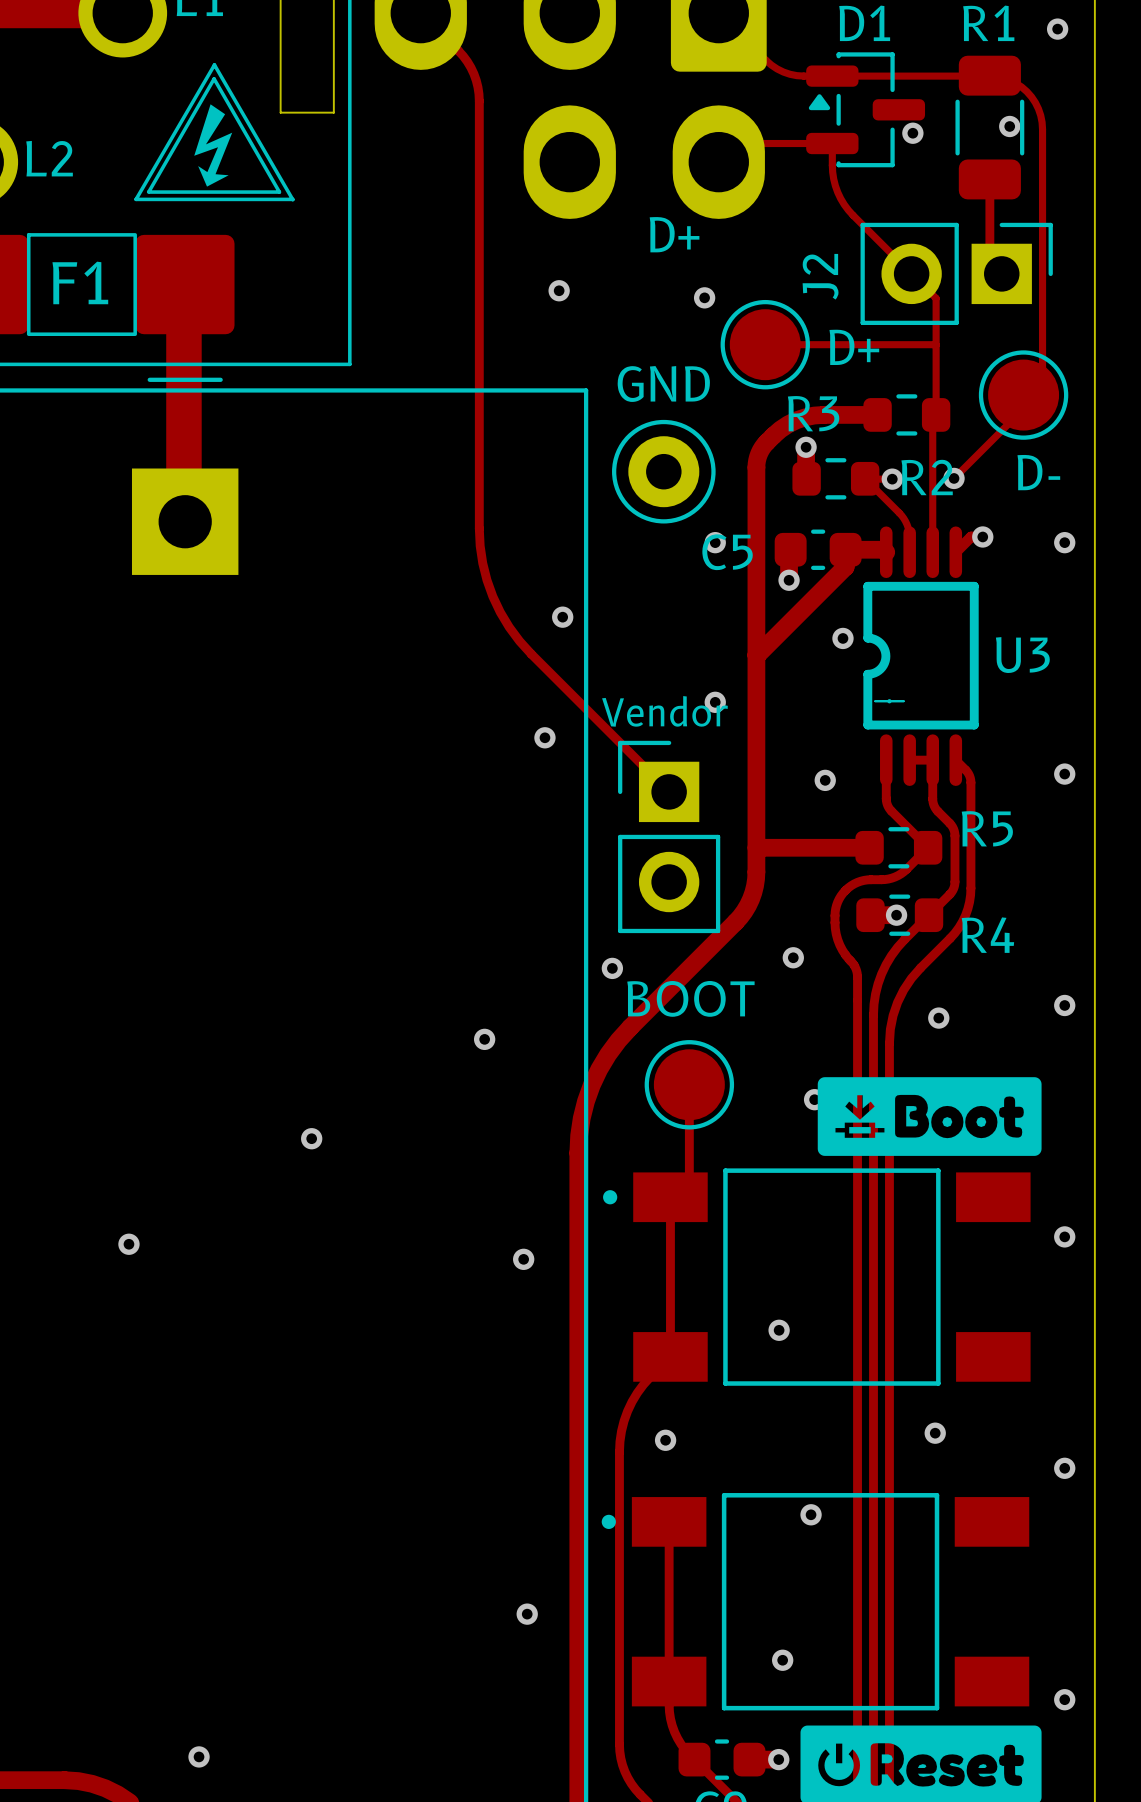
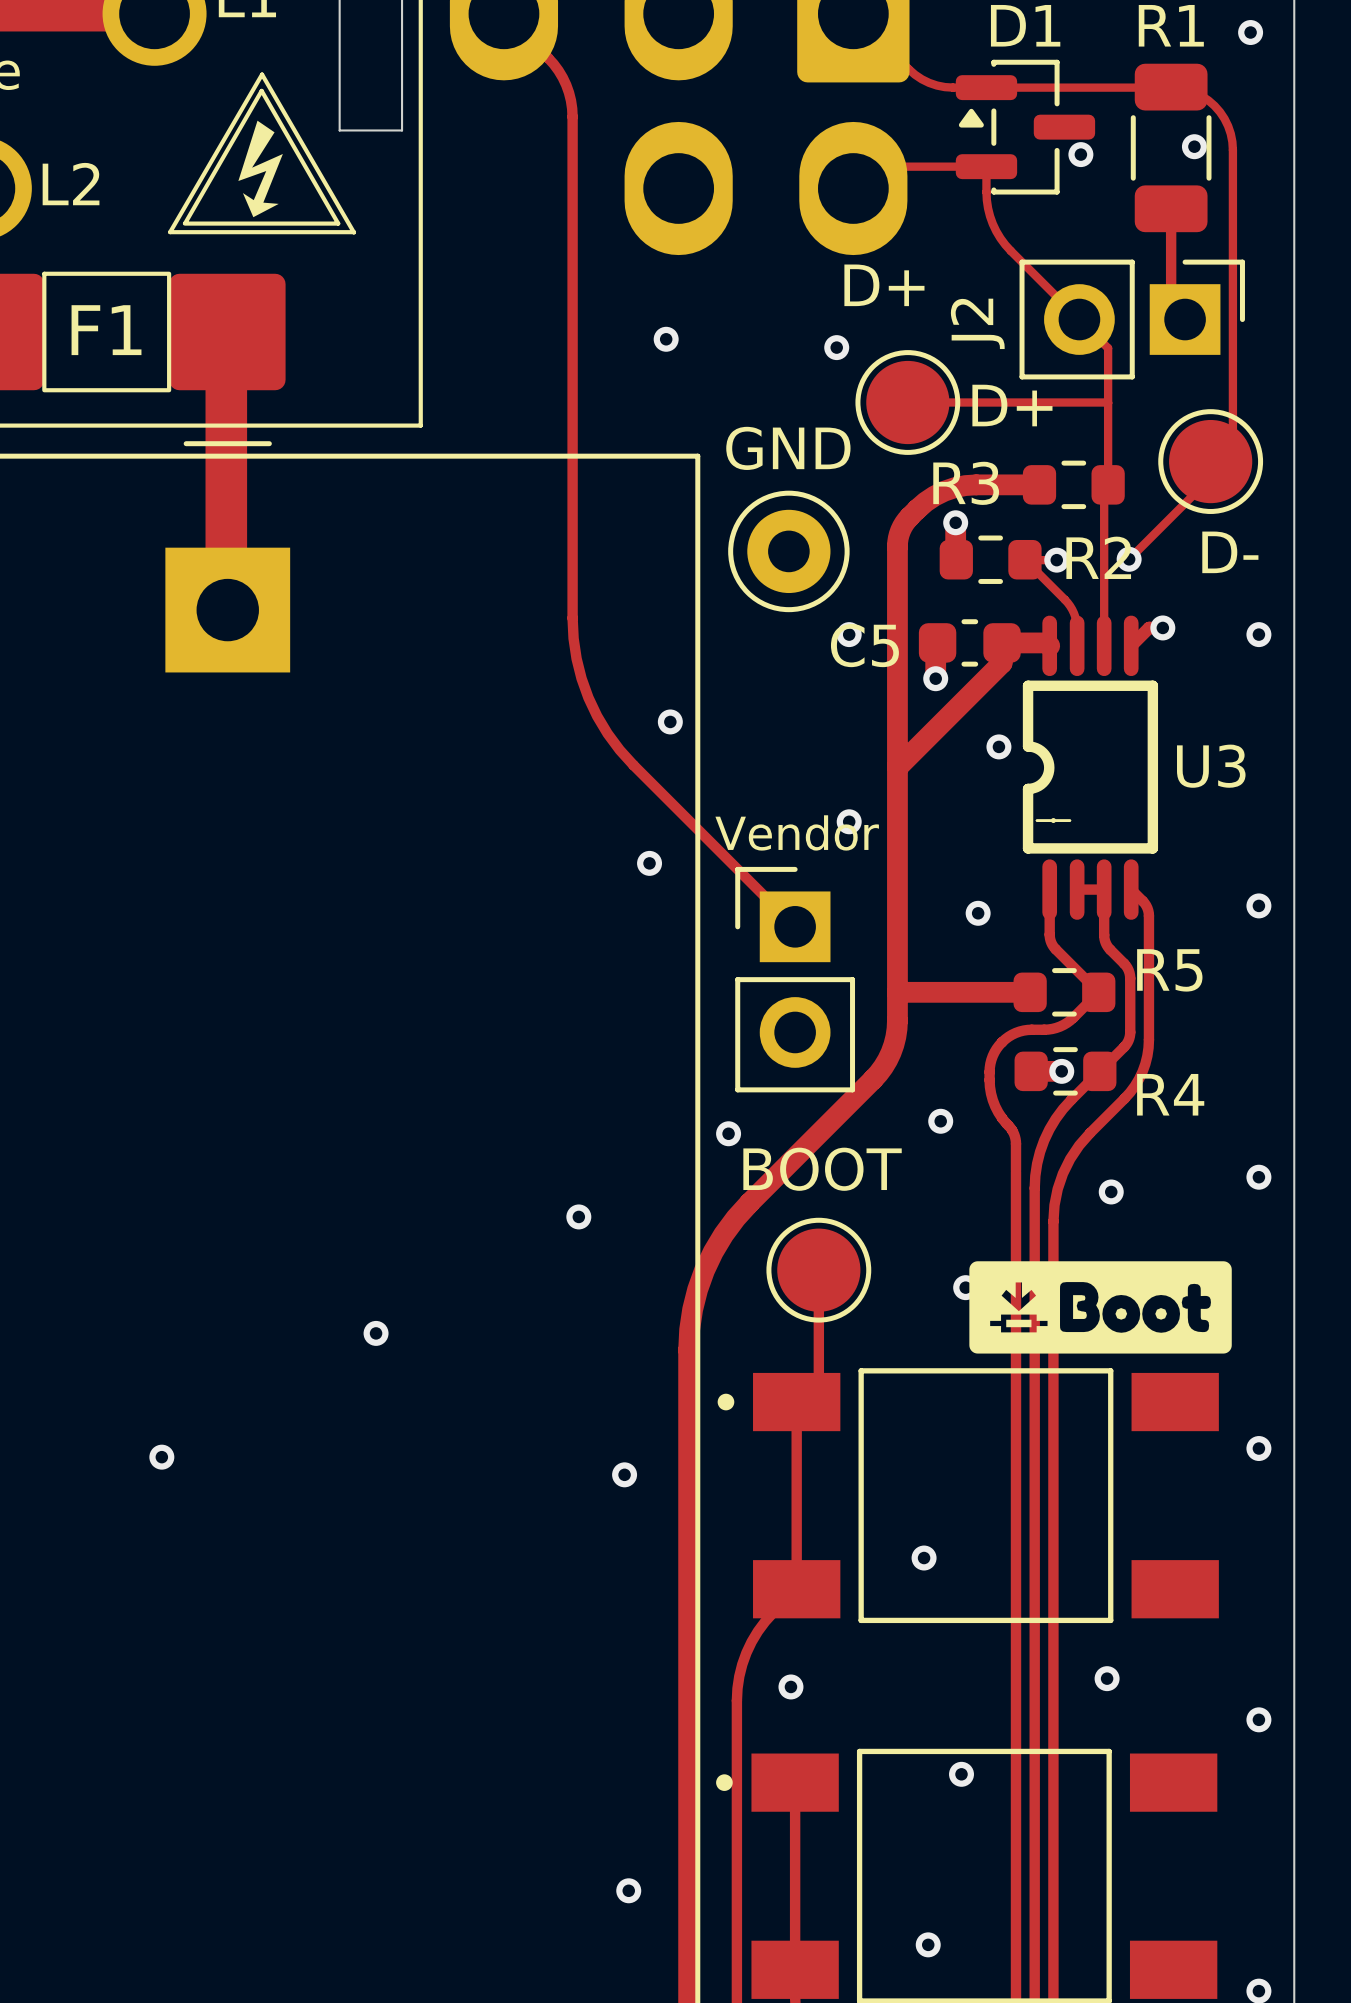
text position: D+ (674, 234) -> D+ (884, 285)

